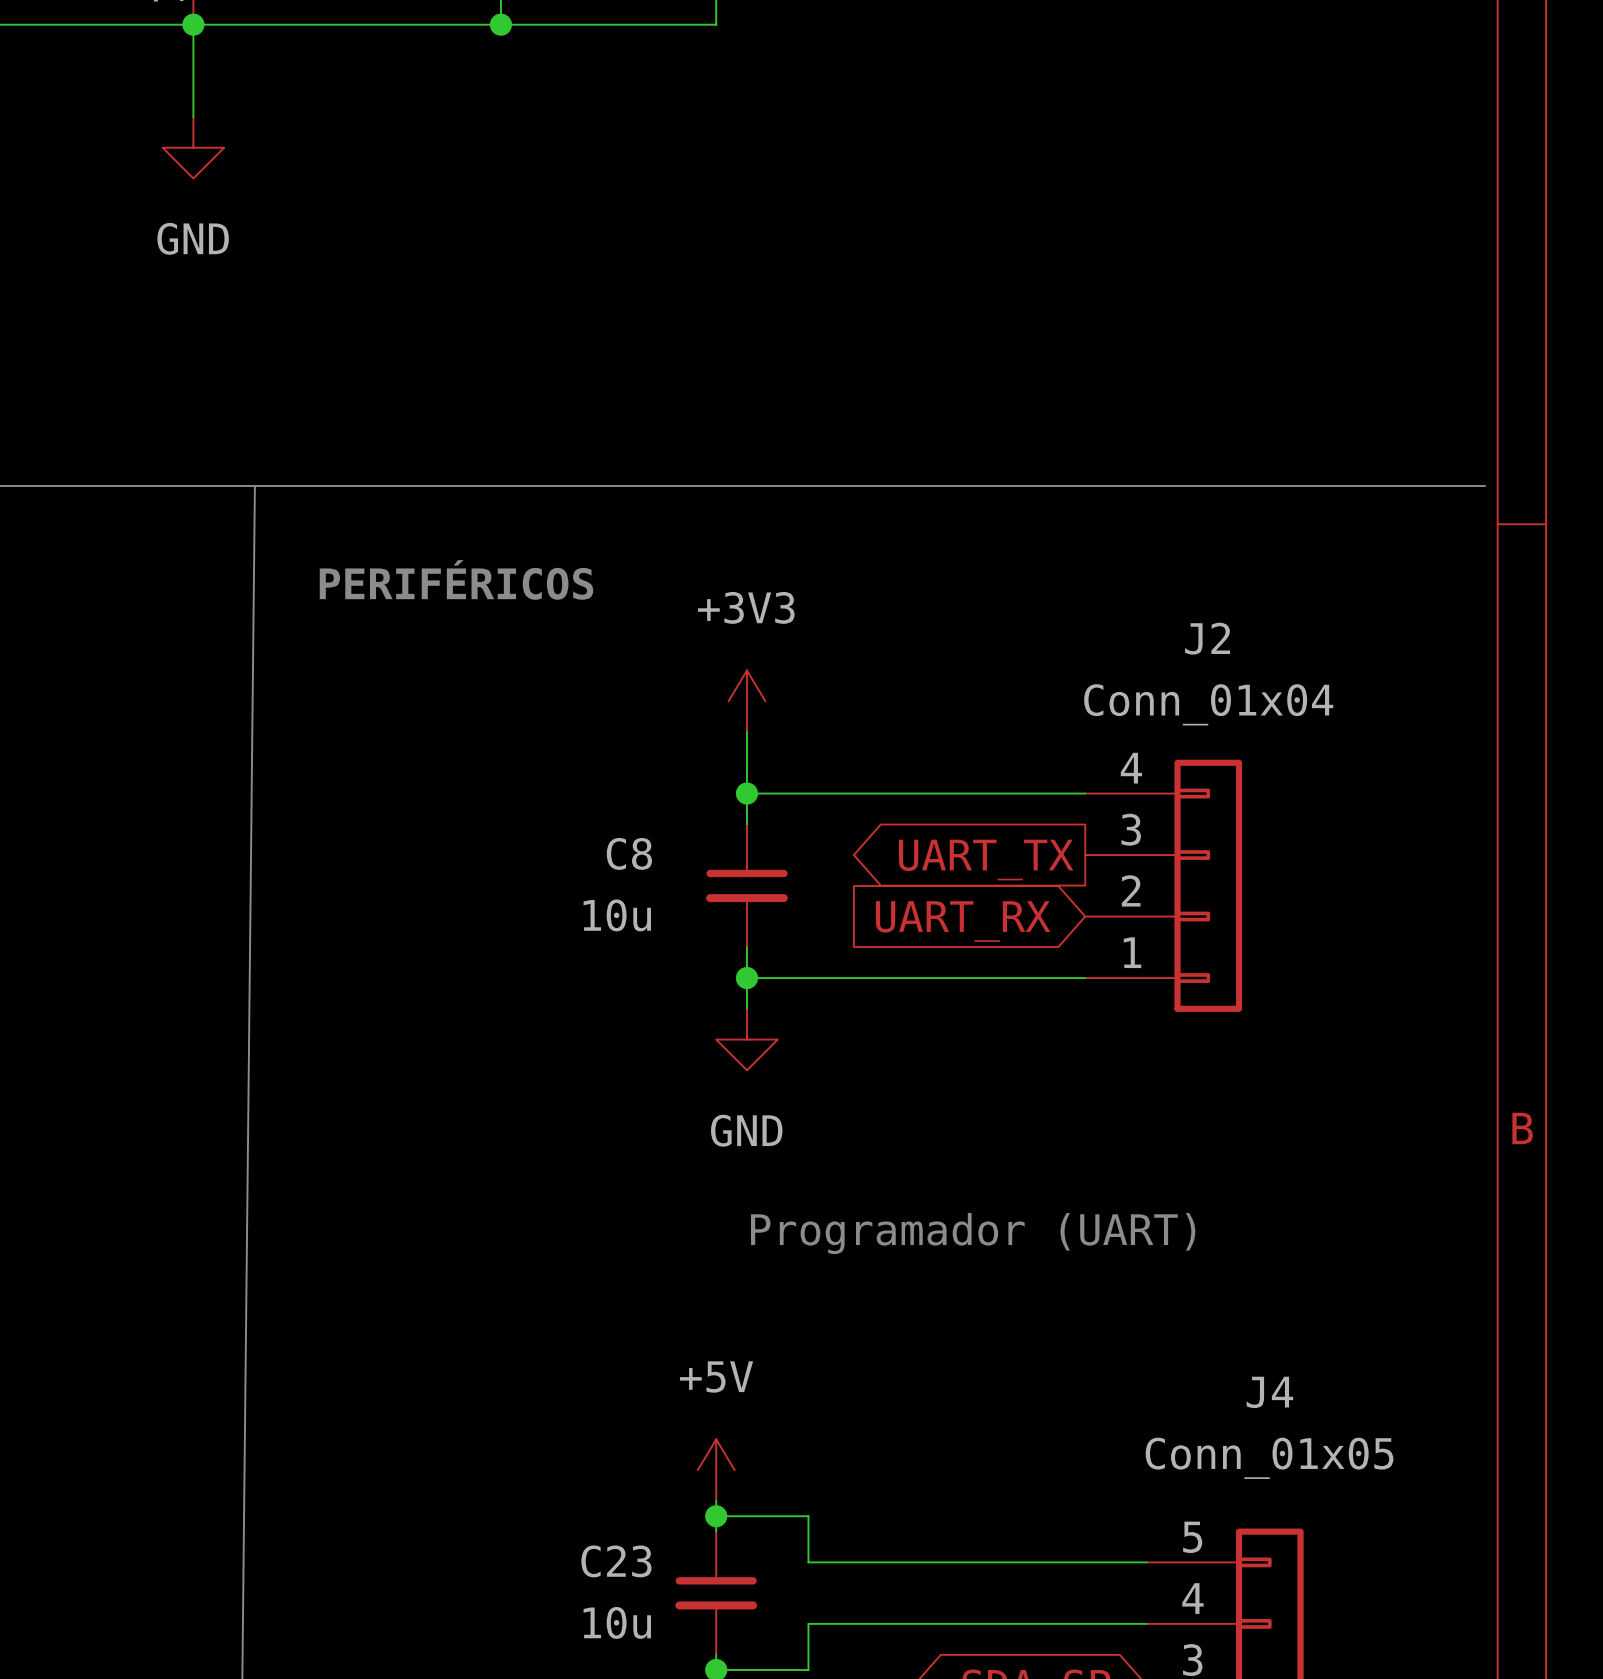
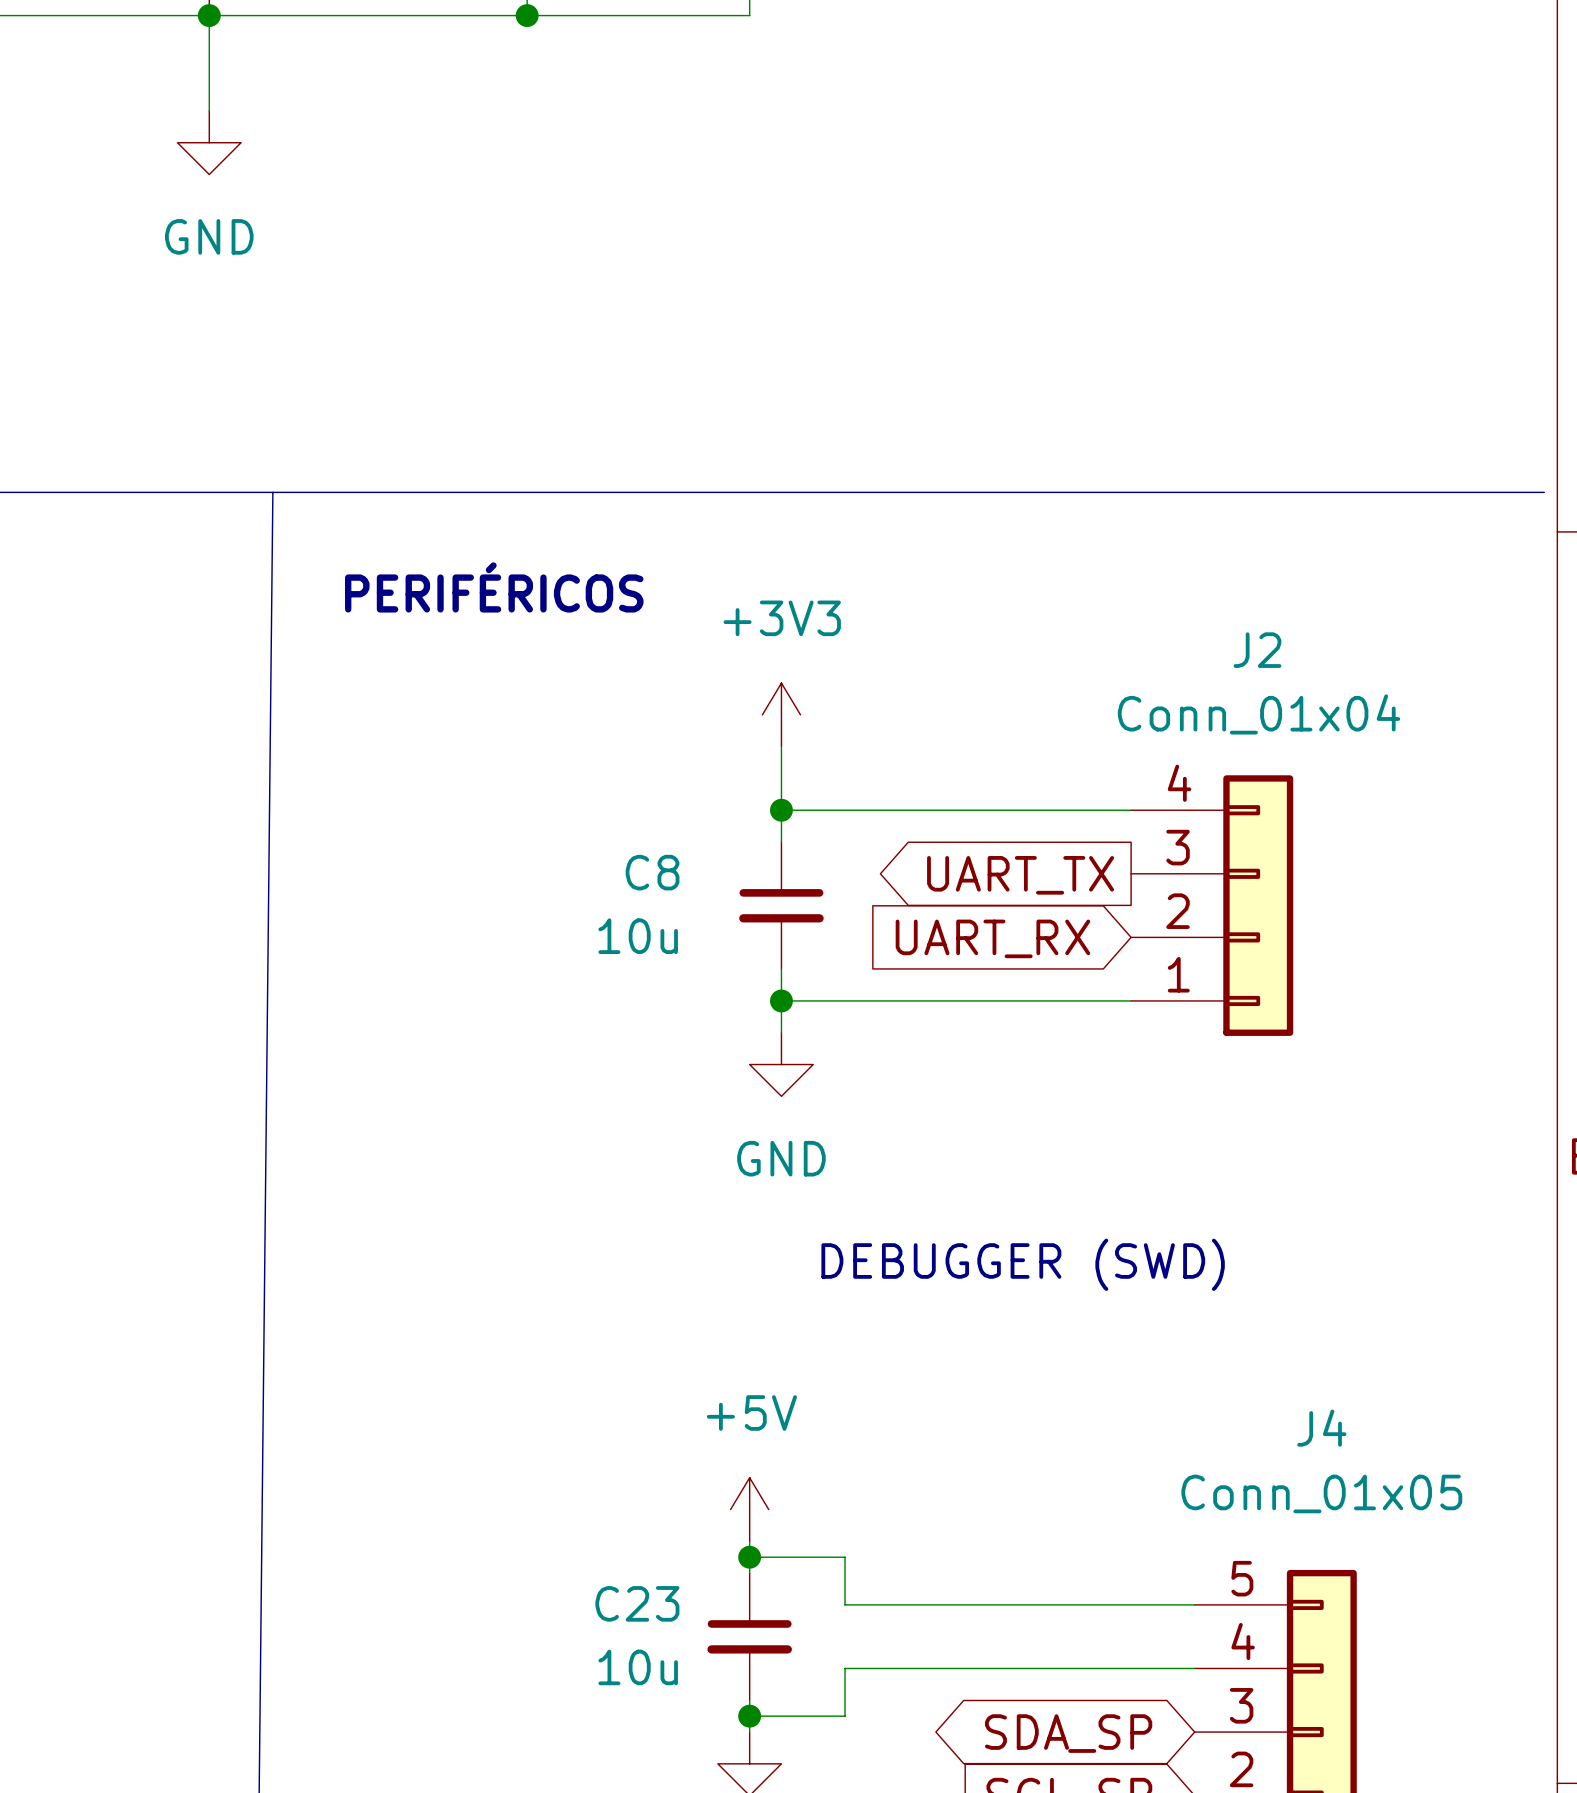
text: none -> DEBUGGER (SWD) (1023, 1264)
text: Programador (UART) (973, 1233) -> none

